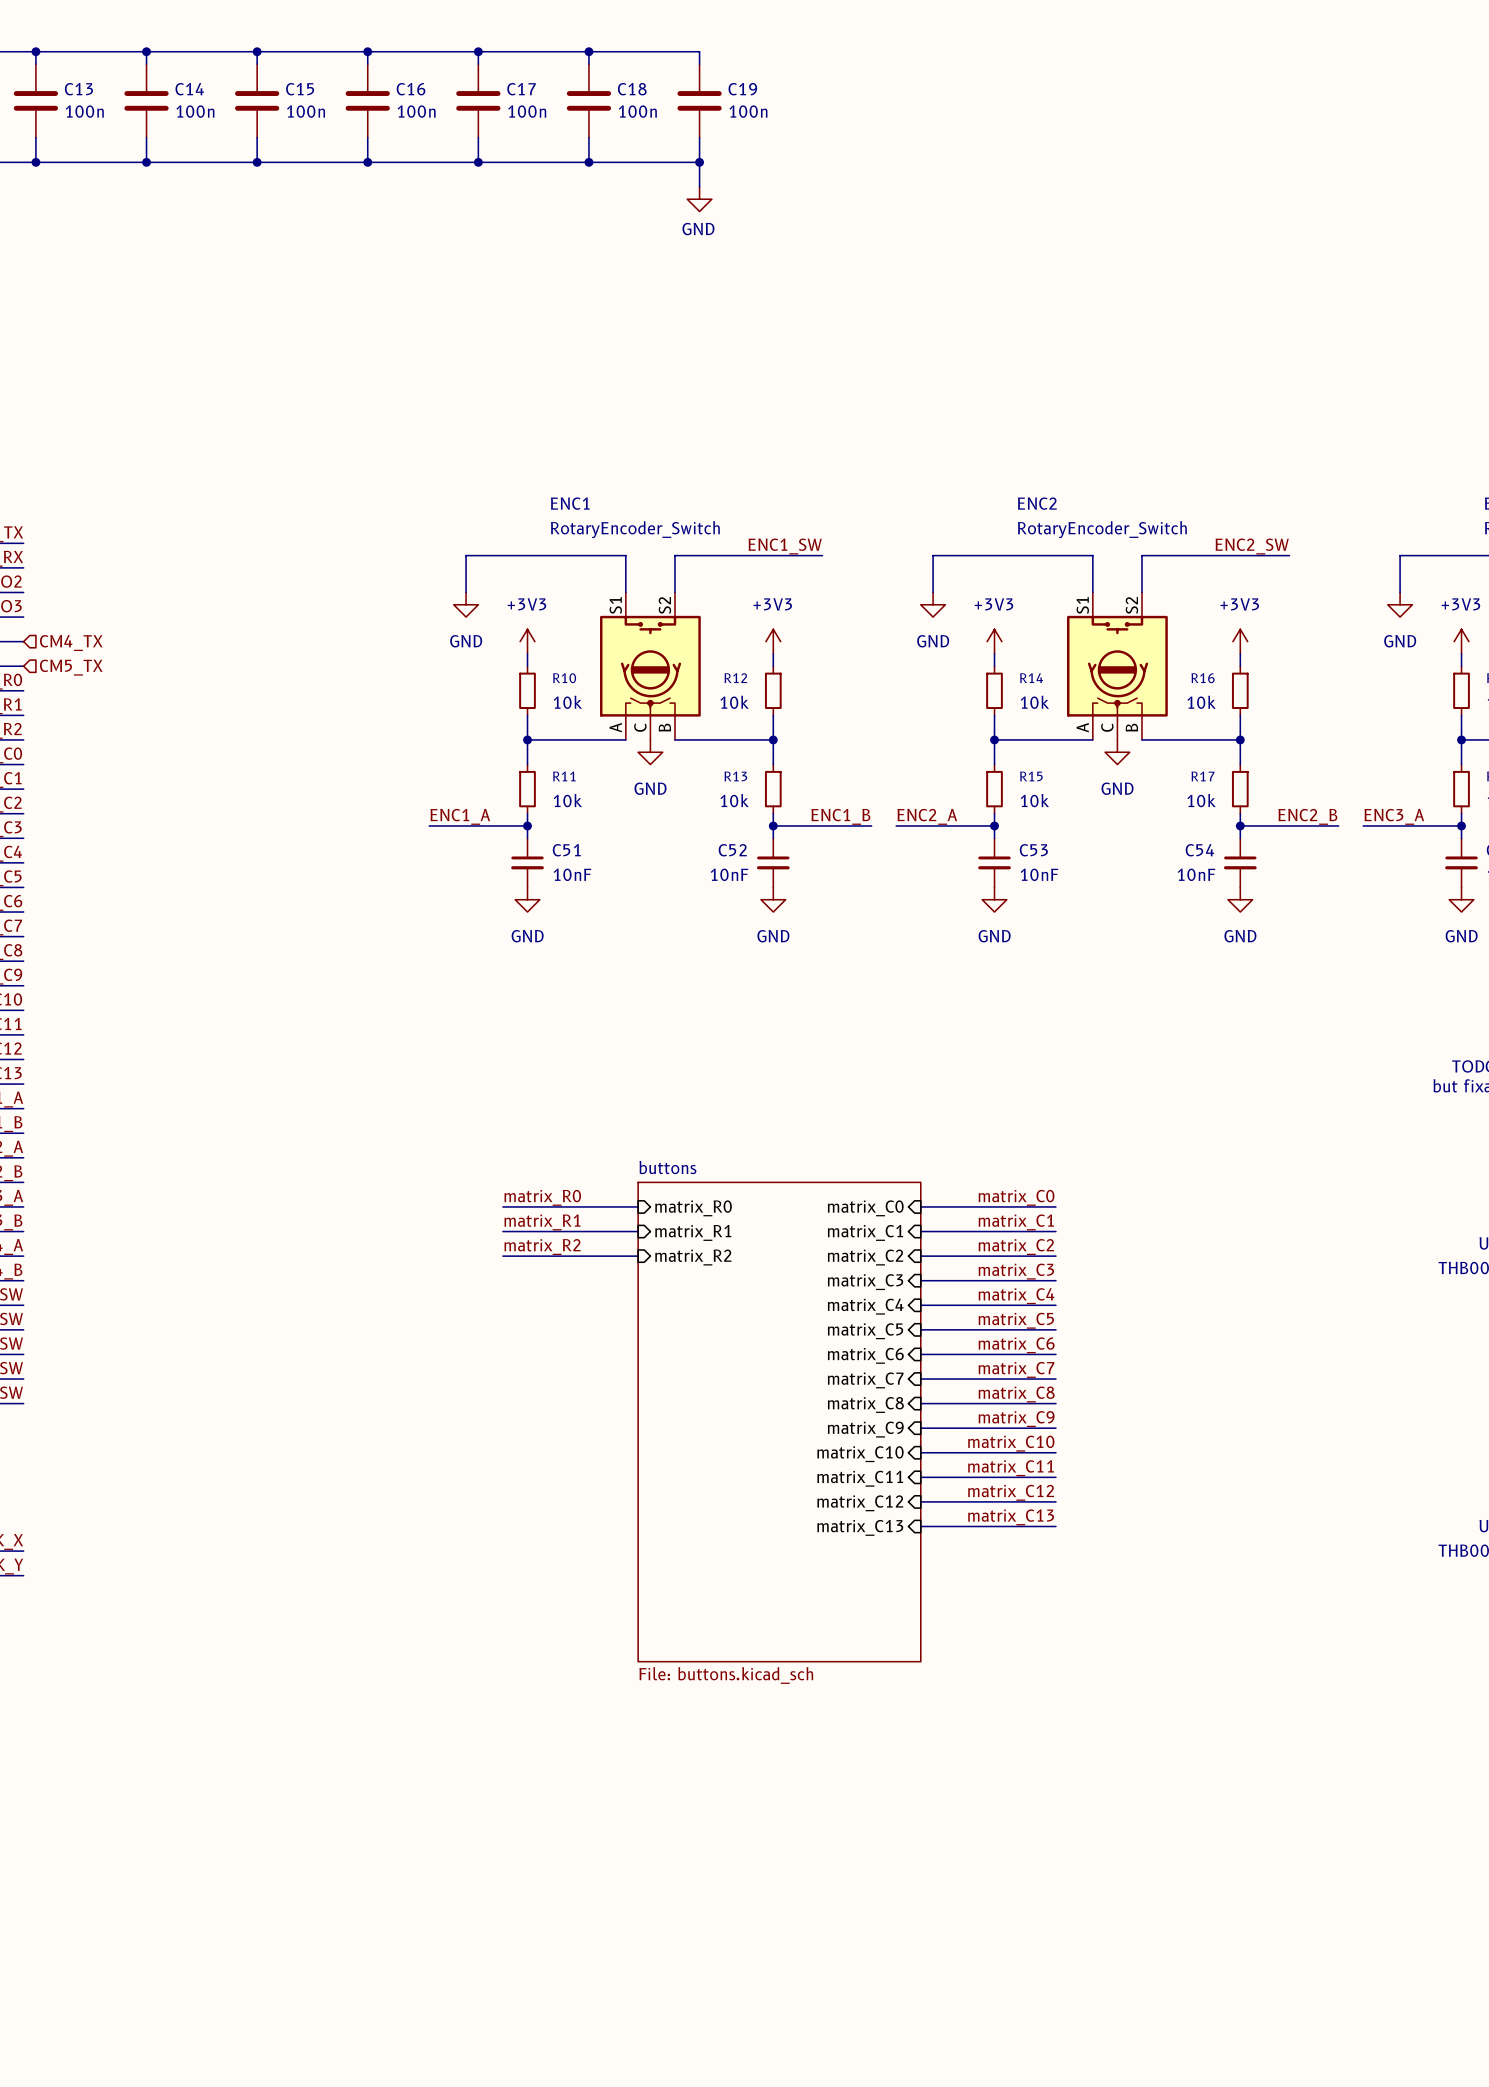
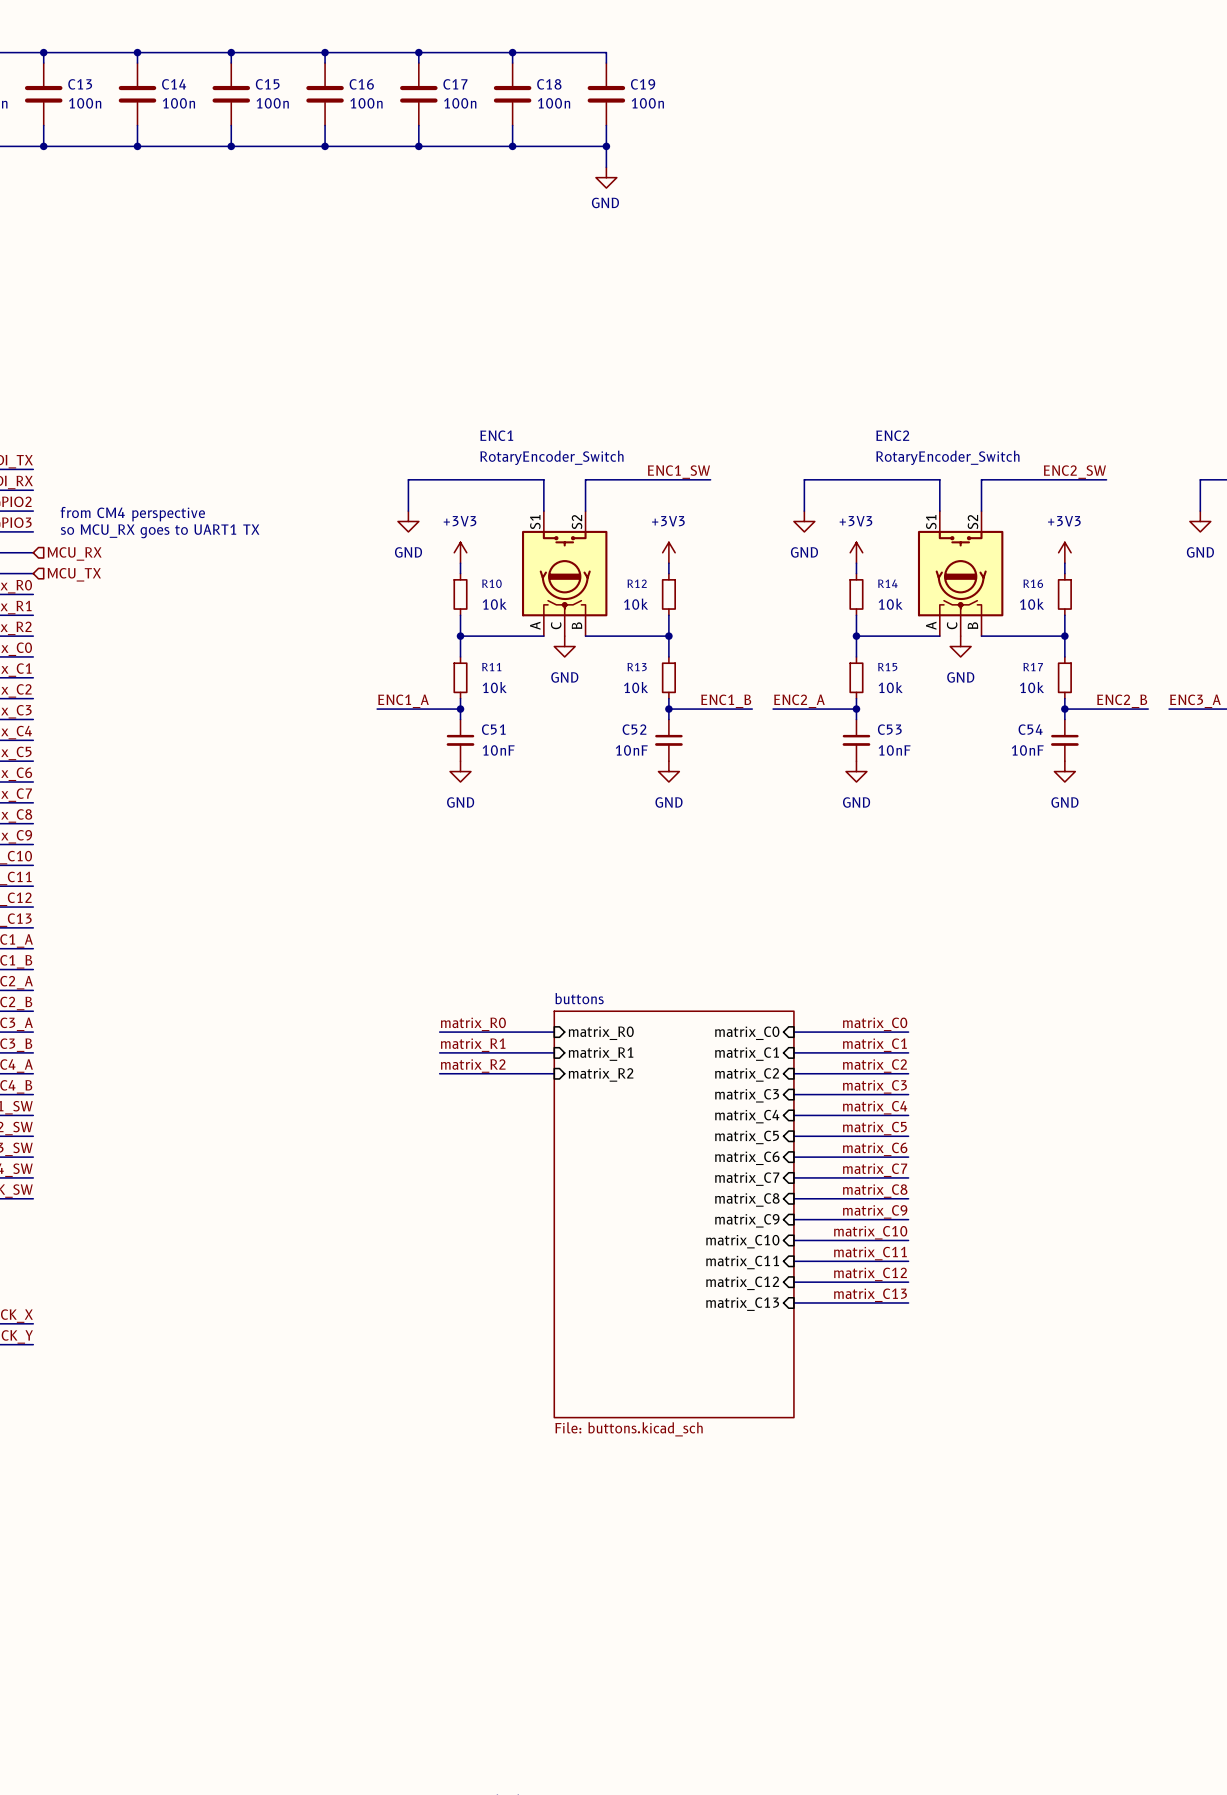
text: none -> from CM4 perspective (132, 514)
text: none -> so MCU_RX goes to UART1 TX (160, 531)
hierarchical label: CM4_TX (71, 643) -> MCU_RX (74, 553)
hierarchical label: CM5_TX (71, 667) -> MCU_TX (74, 574)

